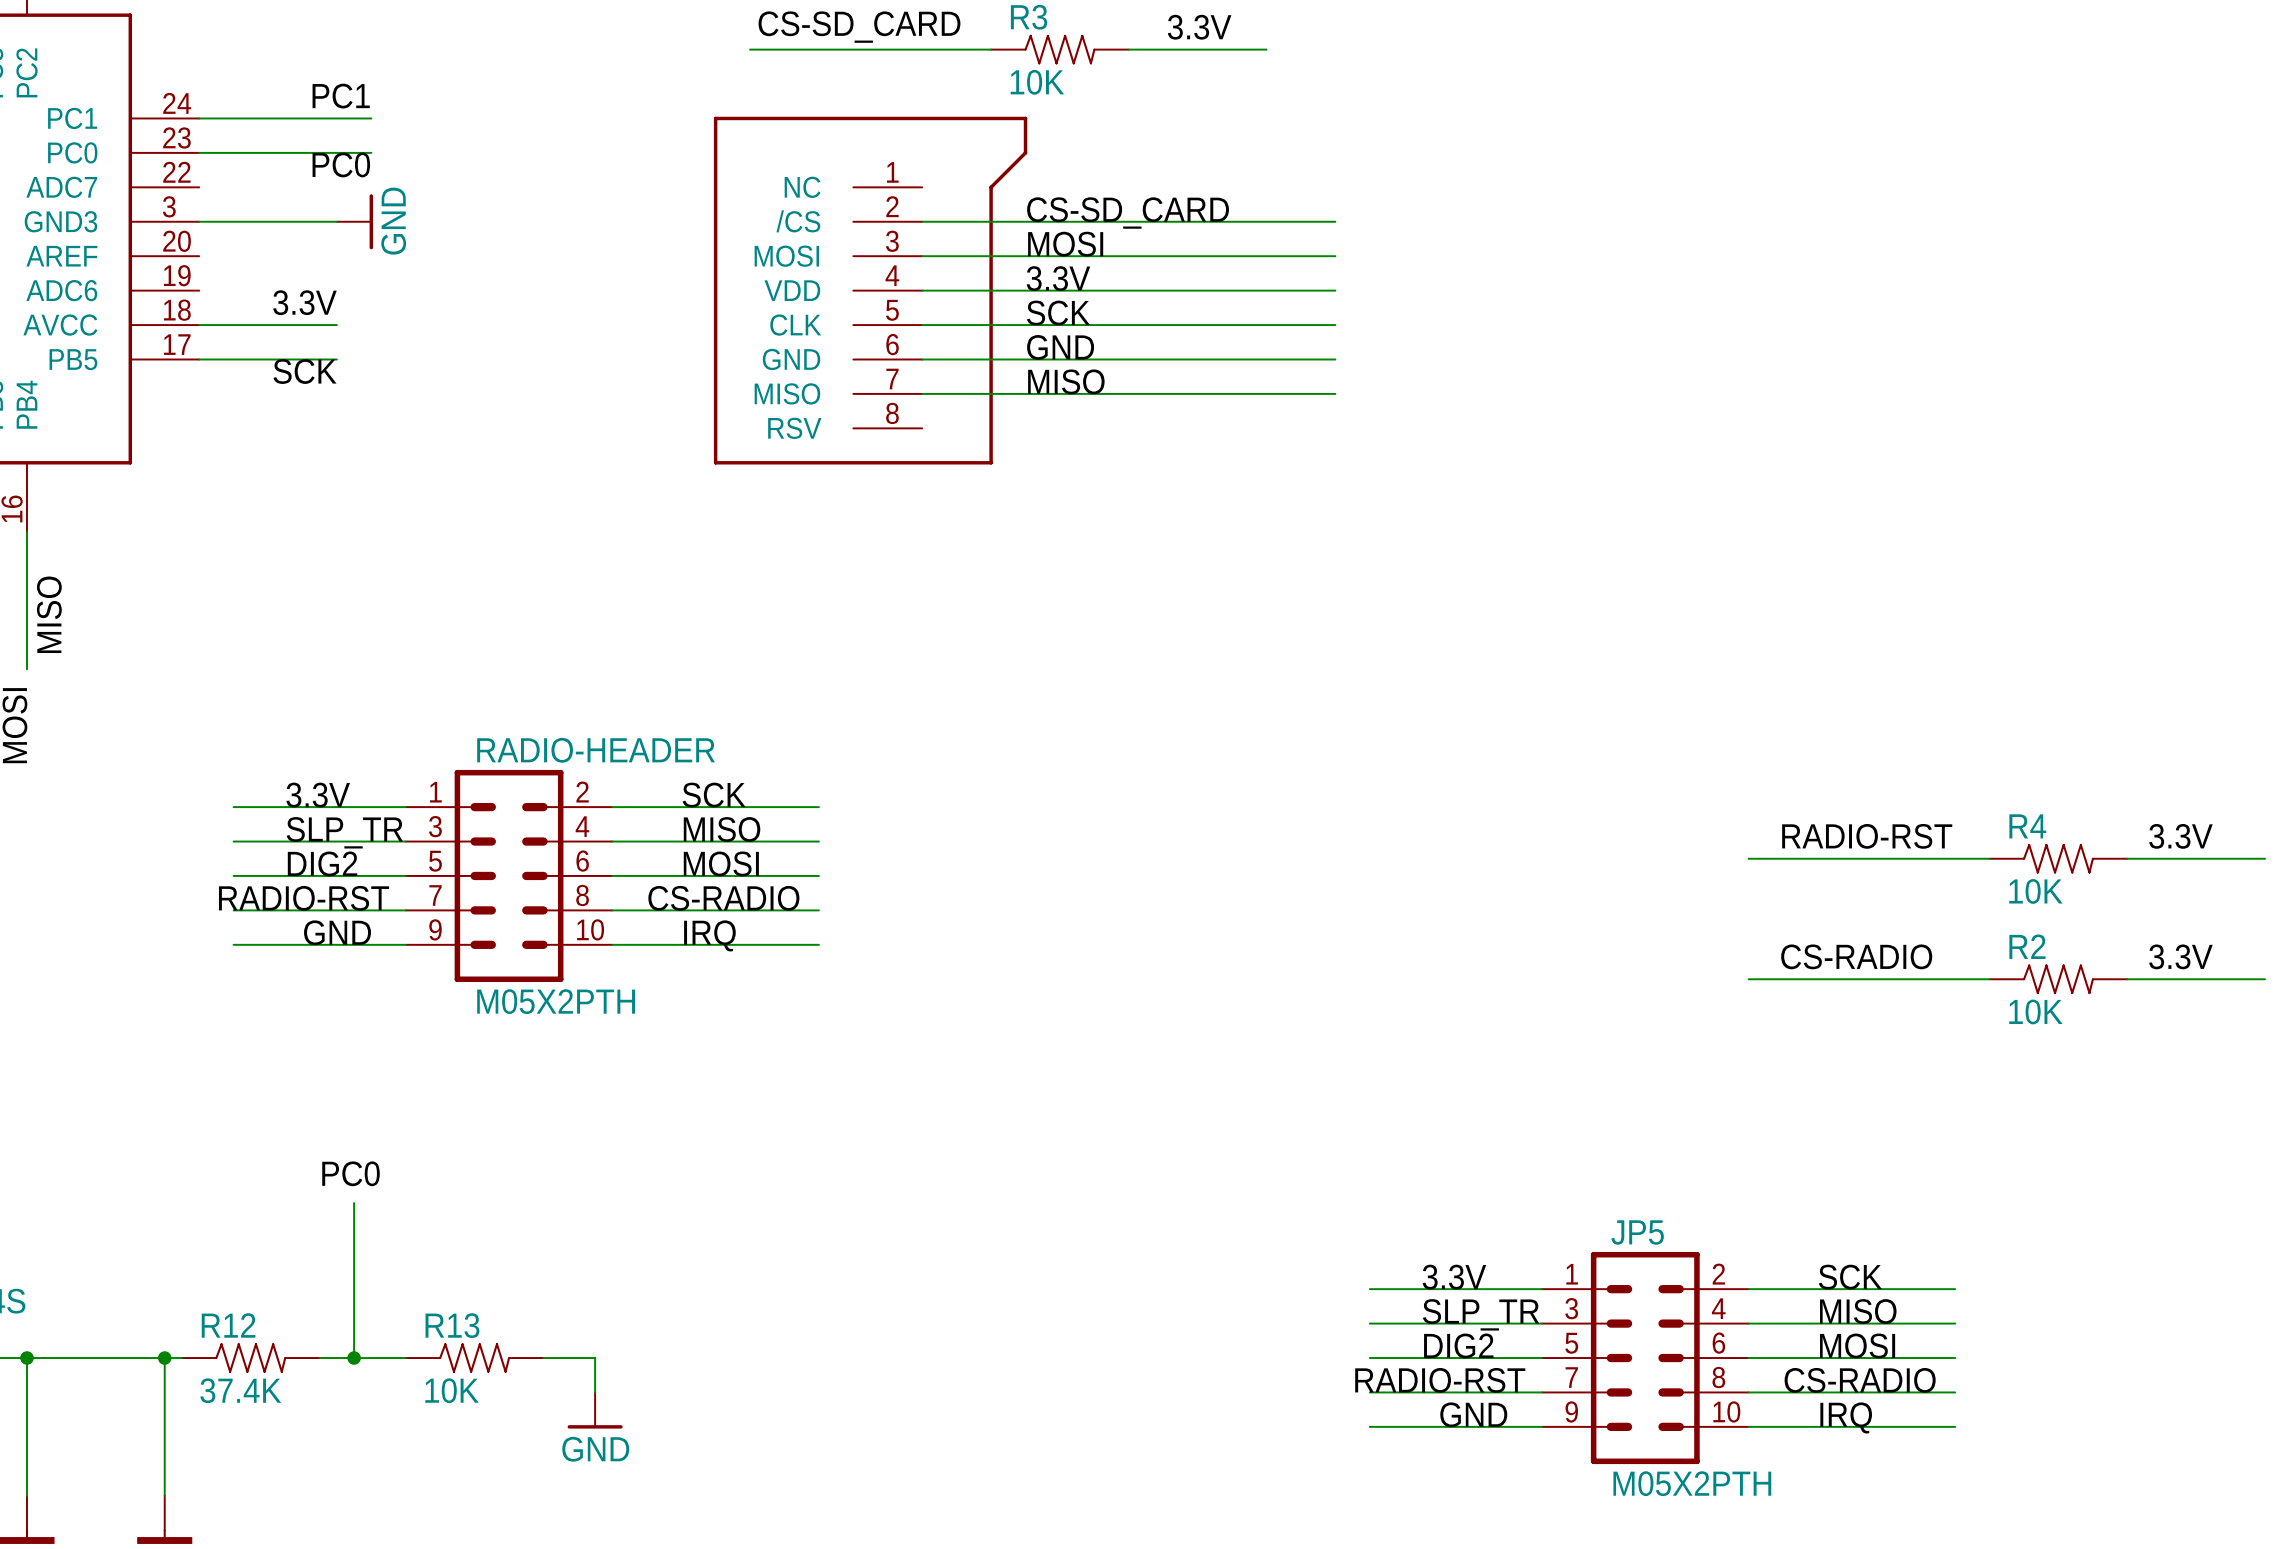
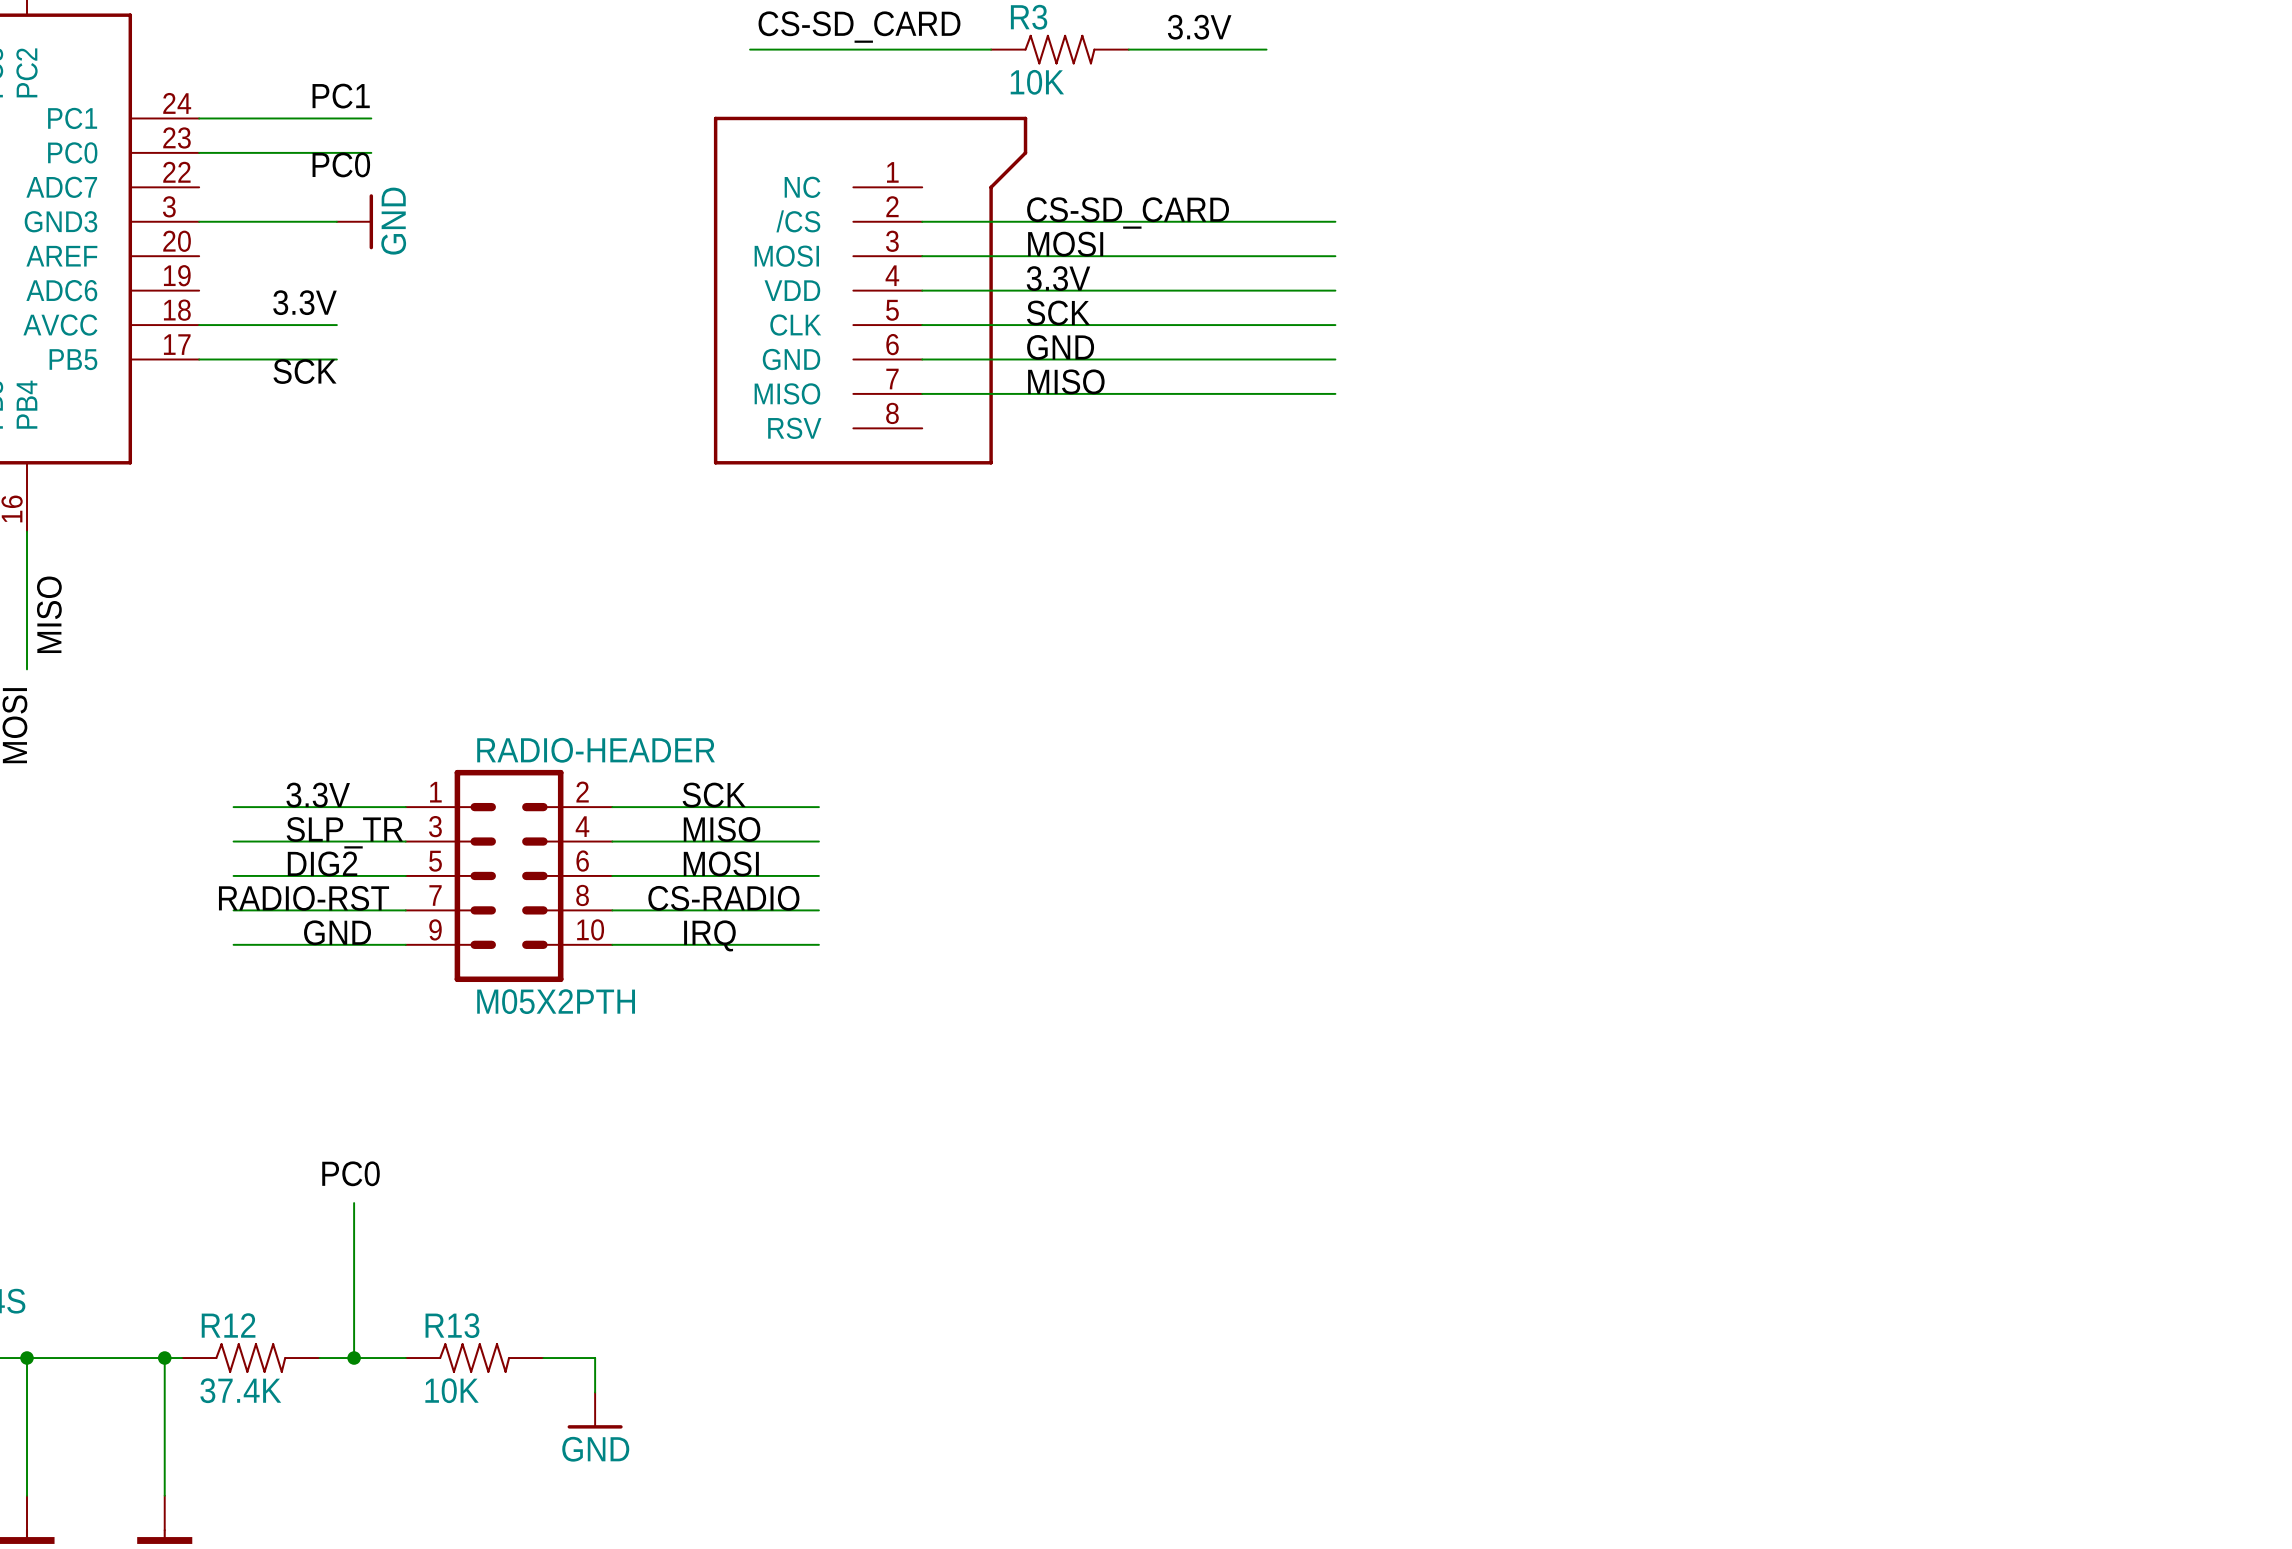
label: RADIO-RST (1867, 836) -> none
label: 3.3V (2180, 836) -> none
wire: (1748, 858) (1989, 858) -> none
R4: 10K (2058, 858) -> none
wire: (2127, 858) (2265, 858) -> none
label: CS-RADIO (1856, 956) -> none
label: 3.3V (2180, 956) -> none
wire: (1748, 979) (1989, 979) -> none
R2: 10K (2058, 979) -> none
wire: (2127, 979) (2265, 979) -> none
label: 3.3V (1454, 1277) -> none
label: SCK (1850, 1277) -> none
wire: (1369, 1289) (1541, 1289) -> none
wire: (1748, 1289) (1955, 1289) -> none
label: MISO (1858, 1311) -> none
label: SLP_TR (1481, 1314) -> none
wire: (1369, 1323) (1541, 1323) -> none
wire: (1748, 1323) (1955, 1323) -> none
label: DIG2 (1458, 1345) -> none
label: MOSI (1857, 1345) -> none
wire: (1369, 1358) (1541, 1358) -> none
JP5: M05X2PTH (1645, 1358) -> none
wire: (1748, 1358) (1955, 1358) -> none
label: RADIO-RST (1440, 1380) -> none
label: CS-RADIO (1860, 1380) -> none
wire: (1369, 1392) (1541, 1392) -> none
wire: (1748, 1392) (1955, 1392) -> none
label: GND (1473, 1414) -> none
label: IRQ (1846, 1417) -> none
wire: (1369, 1426) (1541, 1426) -> none
wire: (1748, 1426) (1955, 1426) -> none

